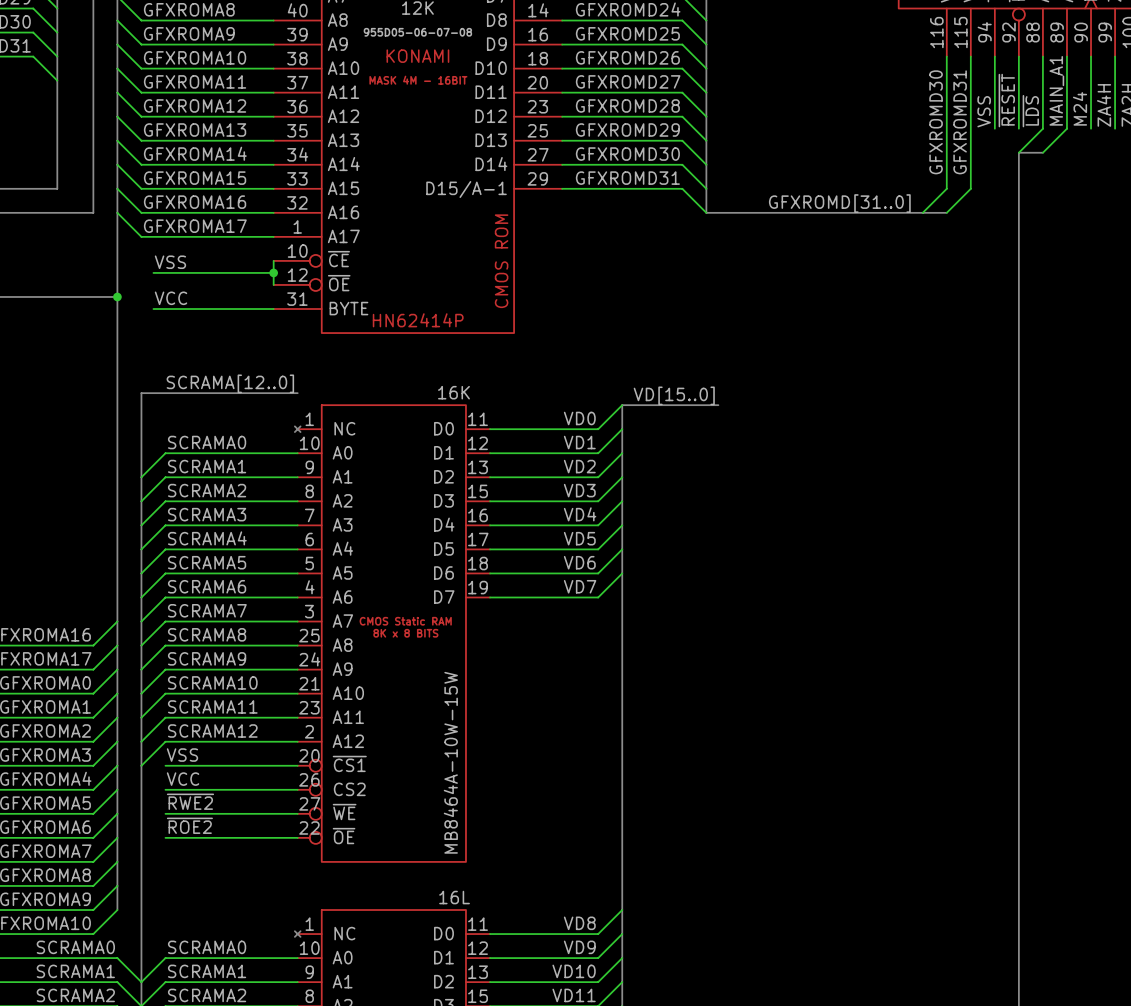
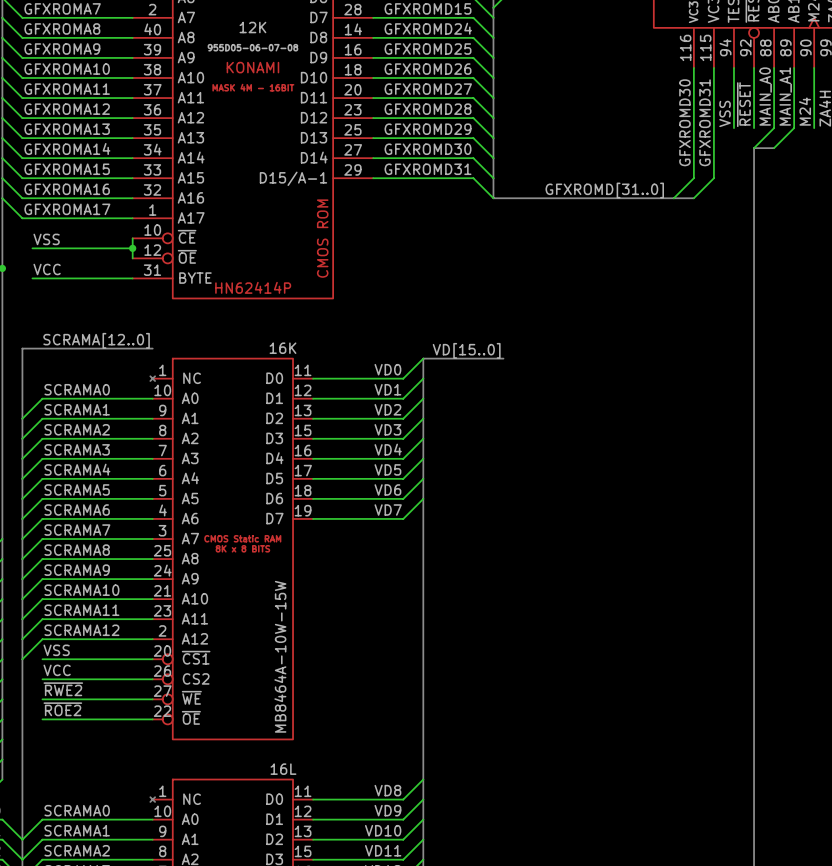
label: ~{LDS} (1030, 111) -> MAIN_A0 (765, 96)

